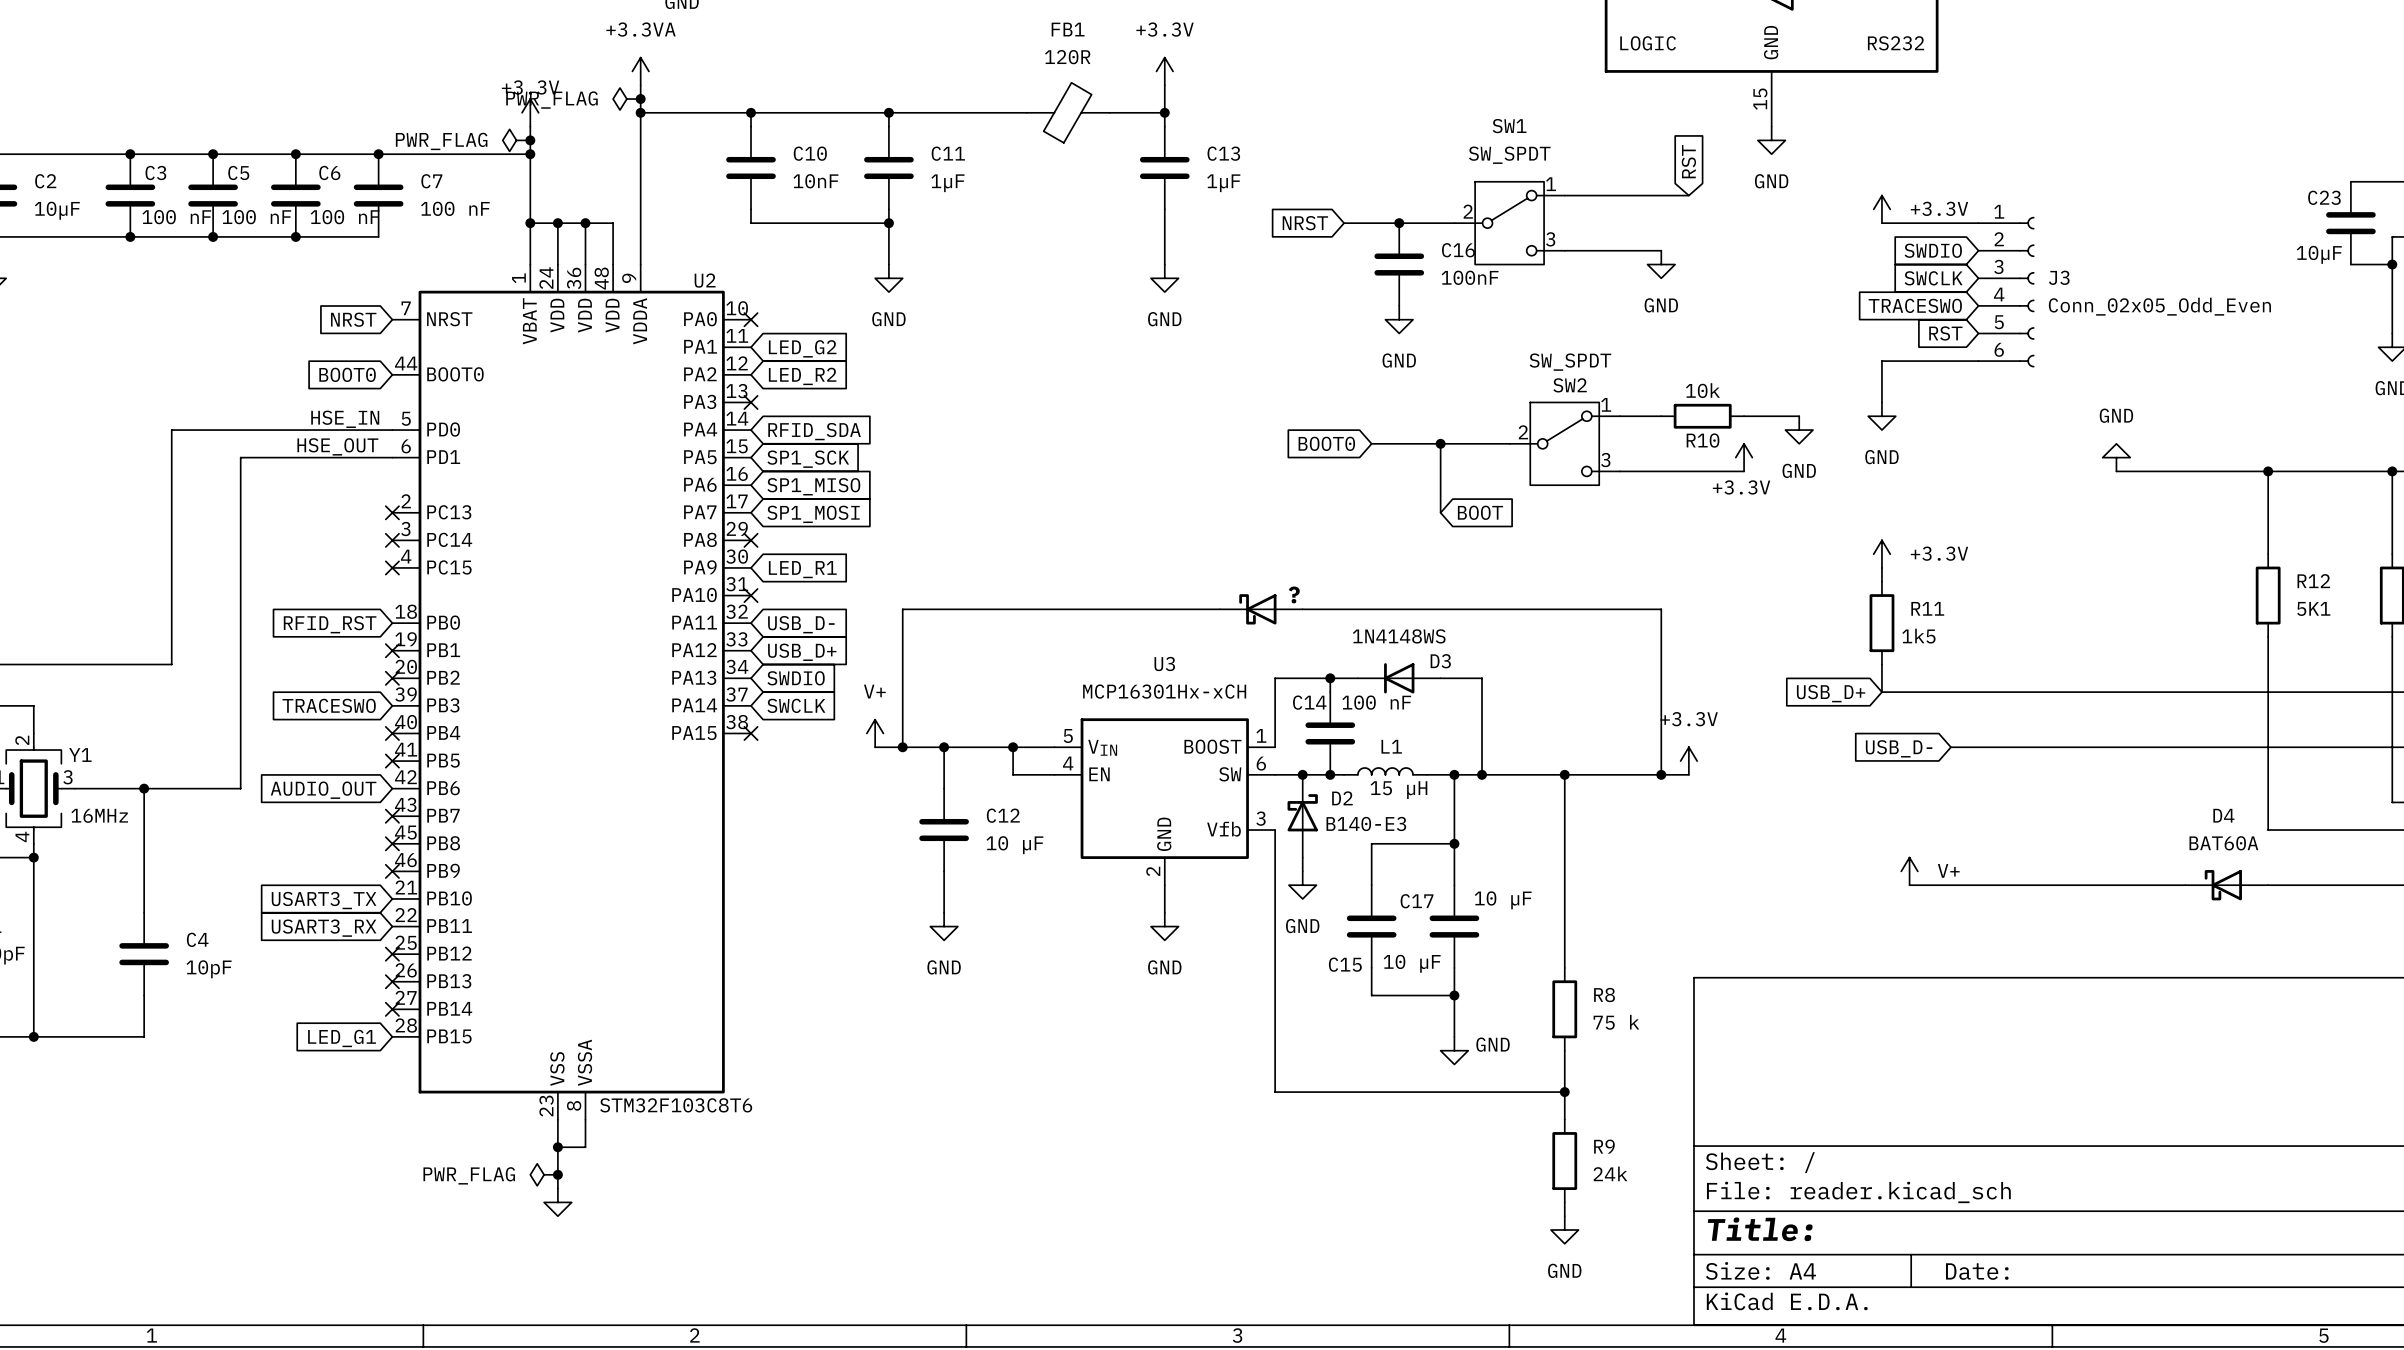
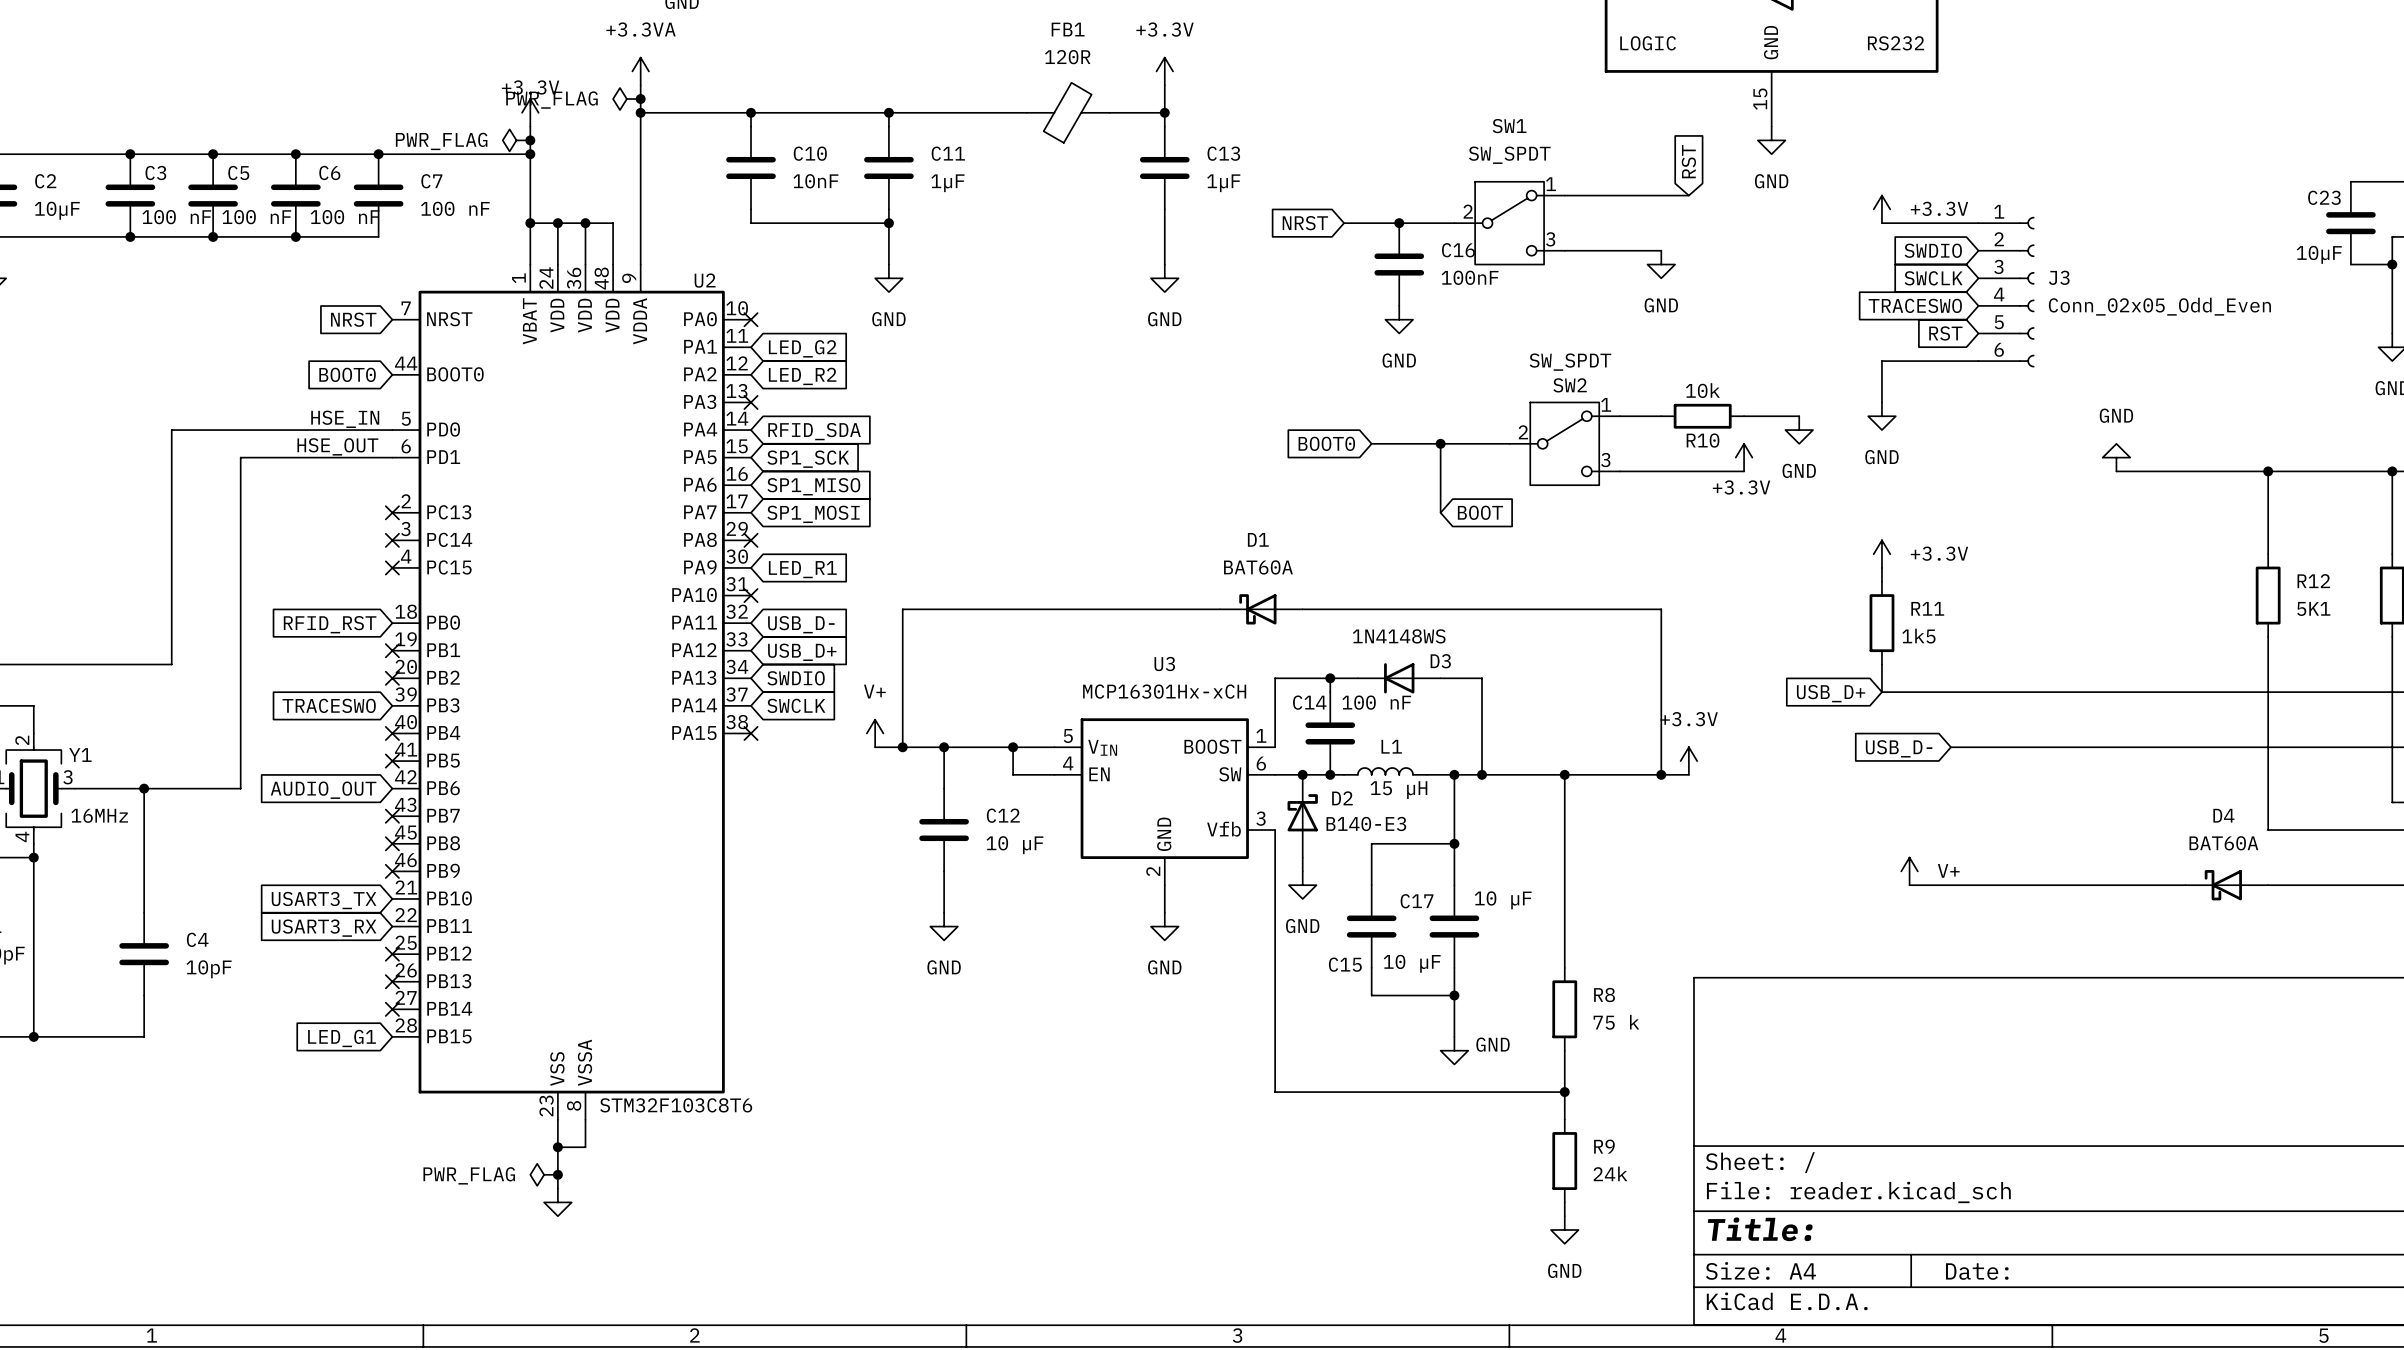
D1 name: none -> D1 (1258, 539)
D1 value: none -> BAT60A (1258, 567)
D1 text: ? (1294, 594) -> none

